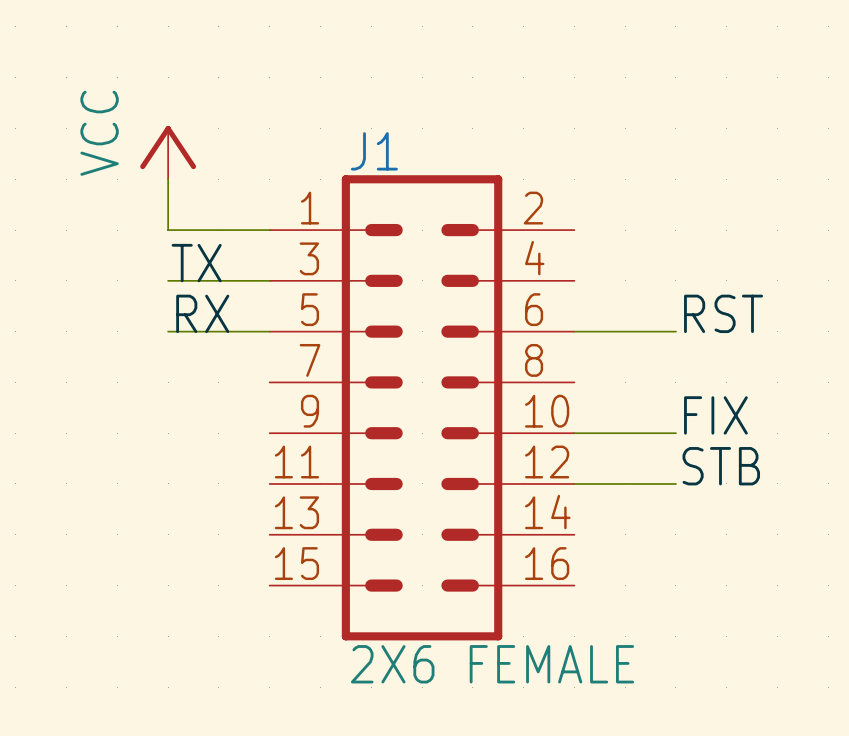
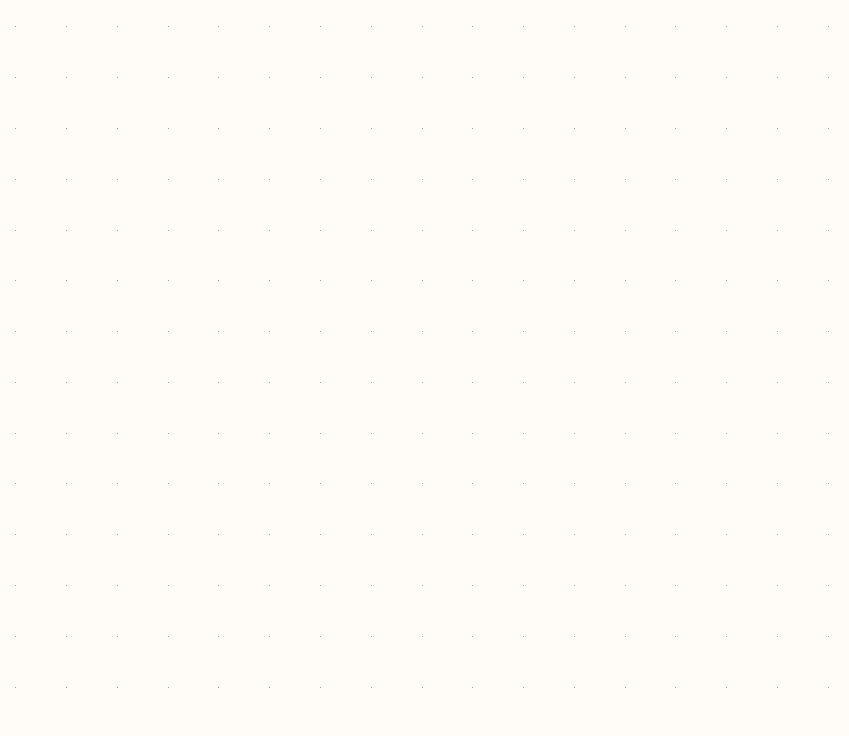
power symbol: VCC (168, 152) -> none
wire: (168, 179) (168, 230) (269, 230) -> none
label: TX (196, 263) -> none
wire: (168, 280) (269, 280) -> none
label: RX (202, 313) -> none
label: RST (723, 313) -> none
wire: (168, 331) (269, 331) -> none
wire: (574, 331) (675, 331) -> none
J1: 2X6 FEMALE (422, 407) -> none
label: FIX (715, 415) -> none
wire: (574, 433) (675, 433) -> none
label: STB (721, 466) -> none
wire: (574, 483) (675, 483) -> none

